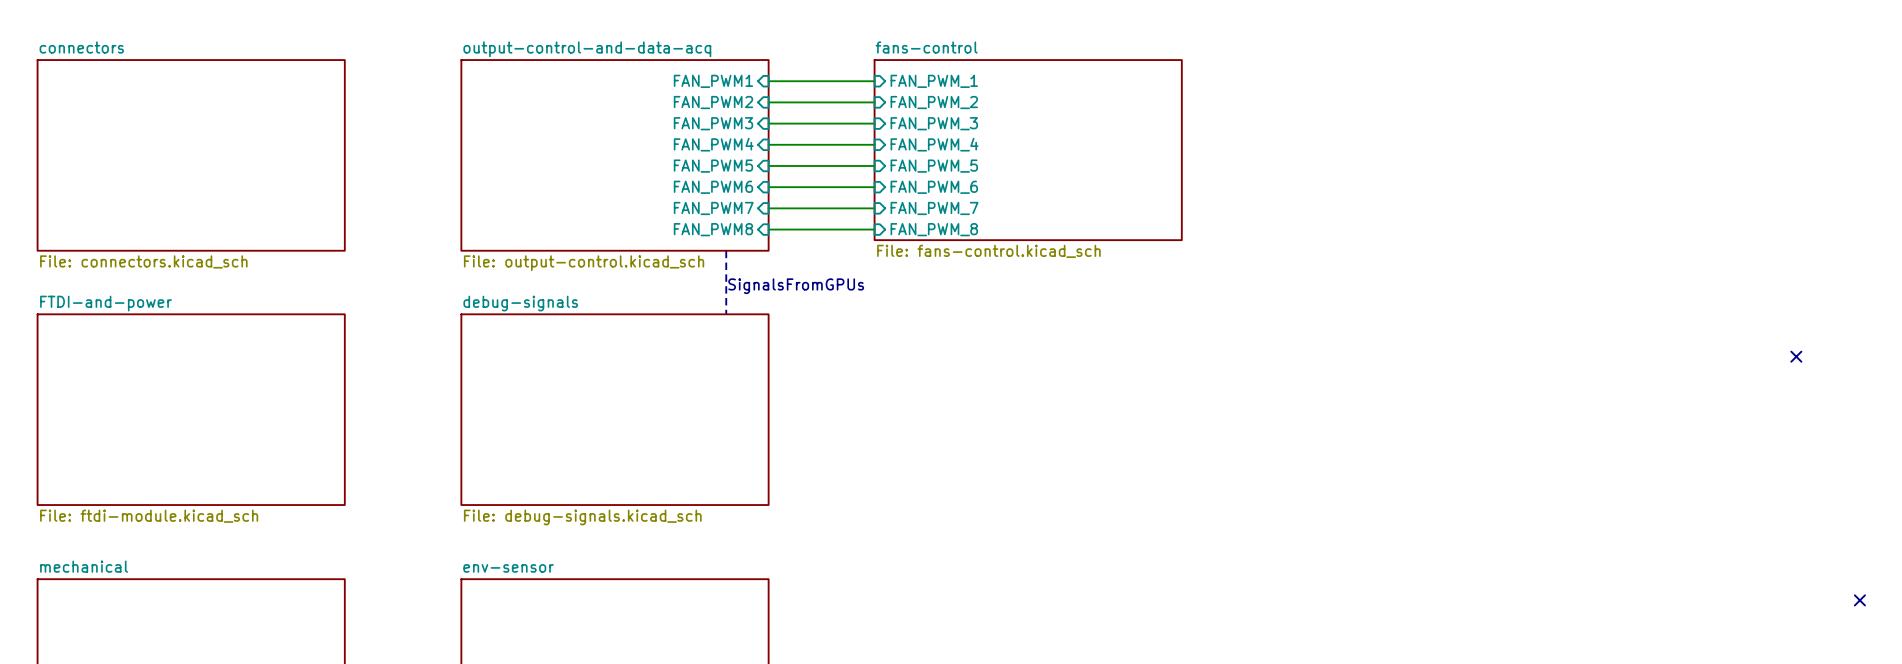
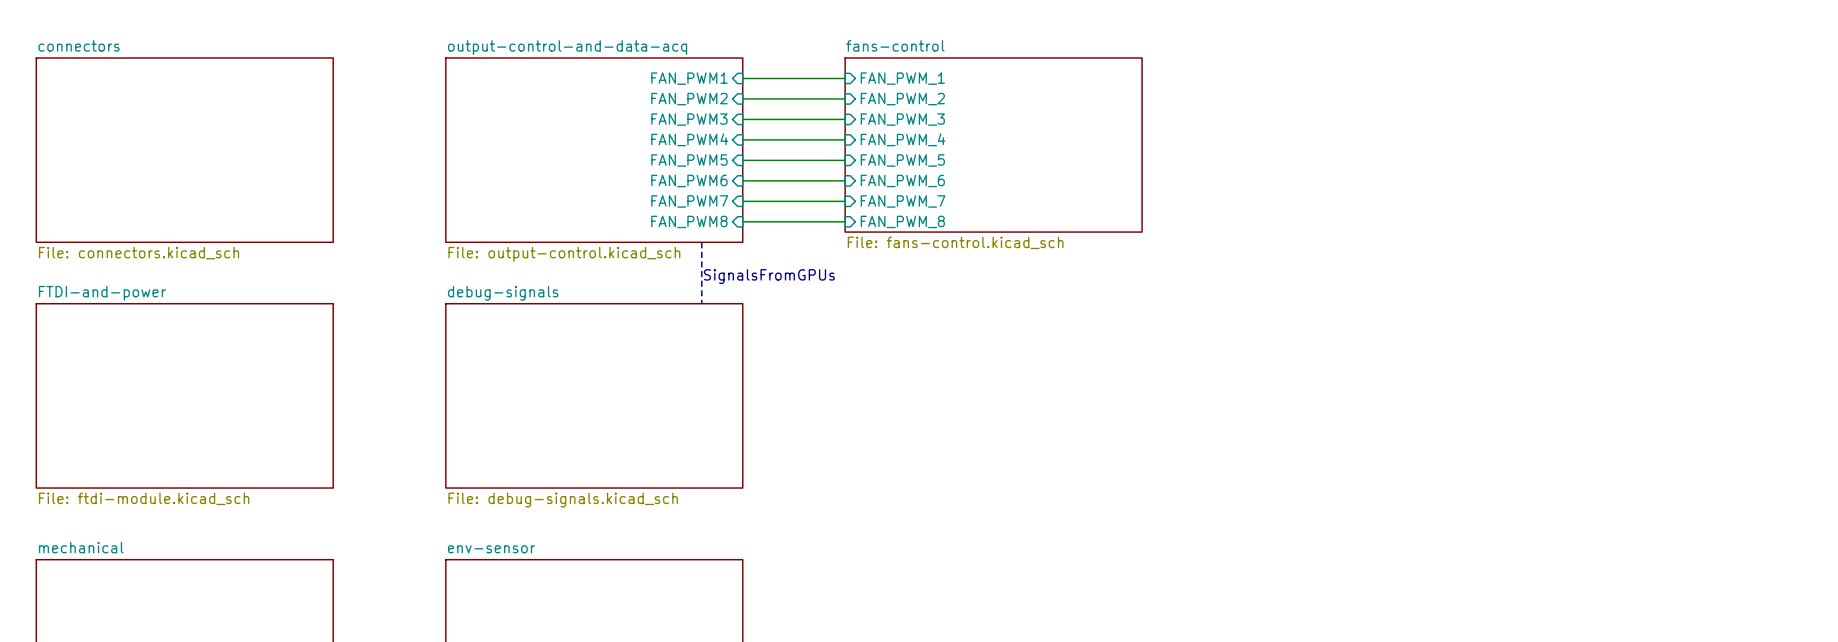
no-connect mark: (1796, 356) -> none
no-connect mark: (1859, 600) -> none

